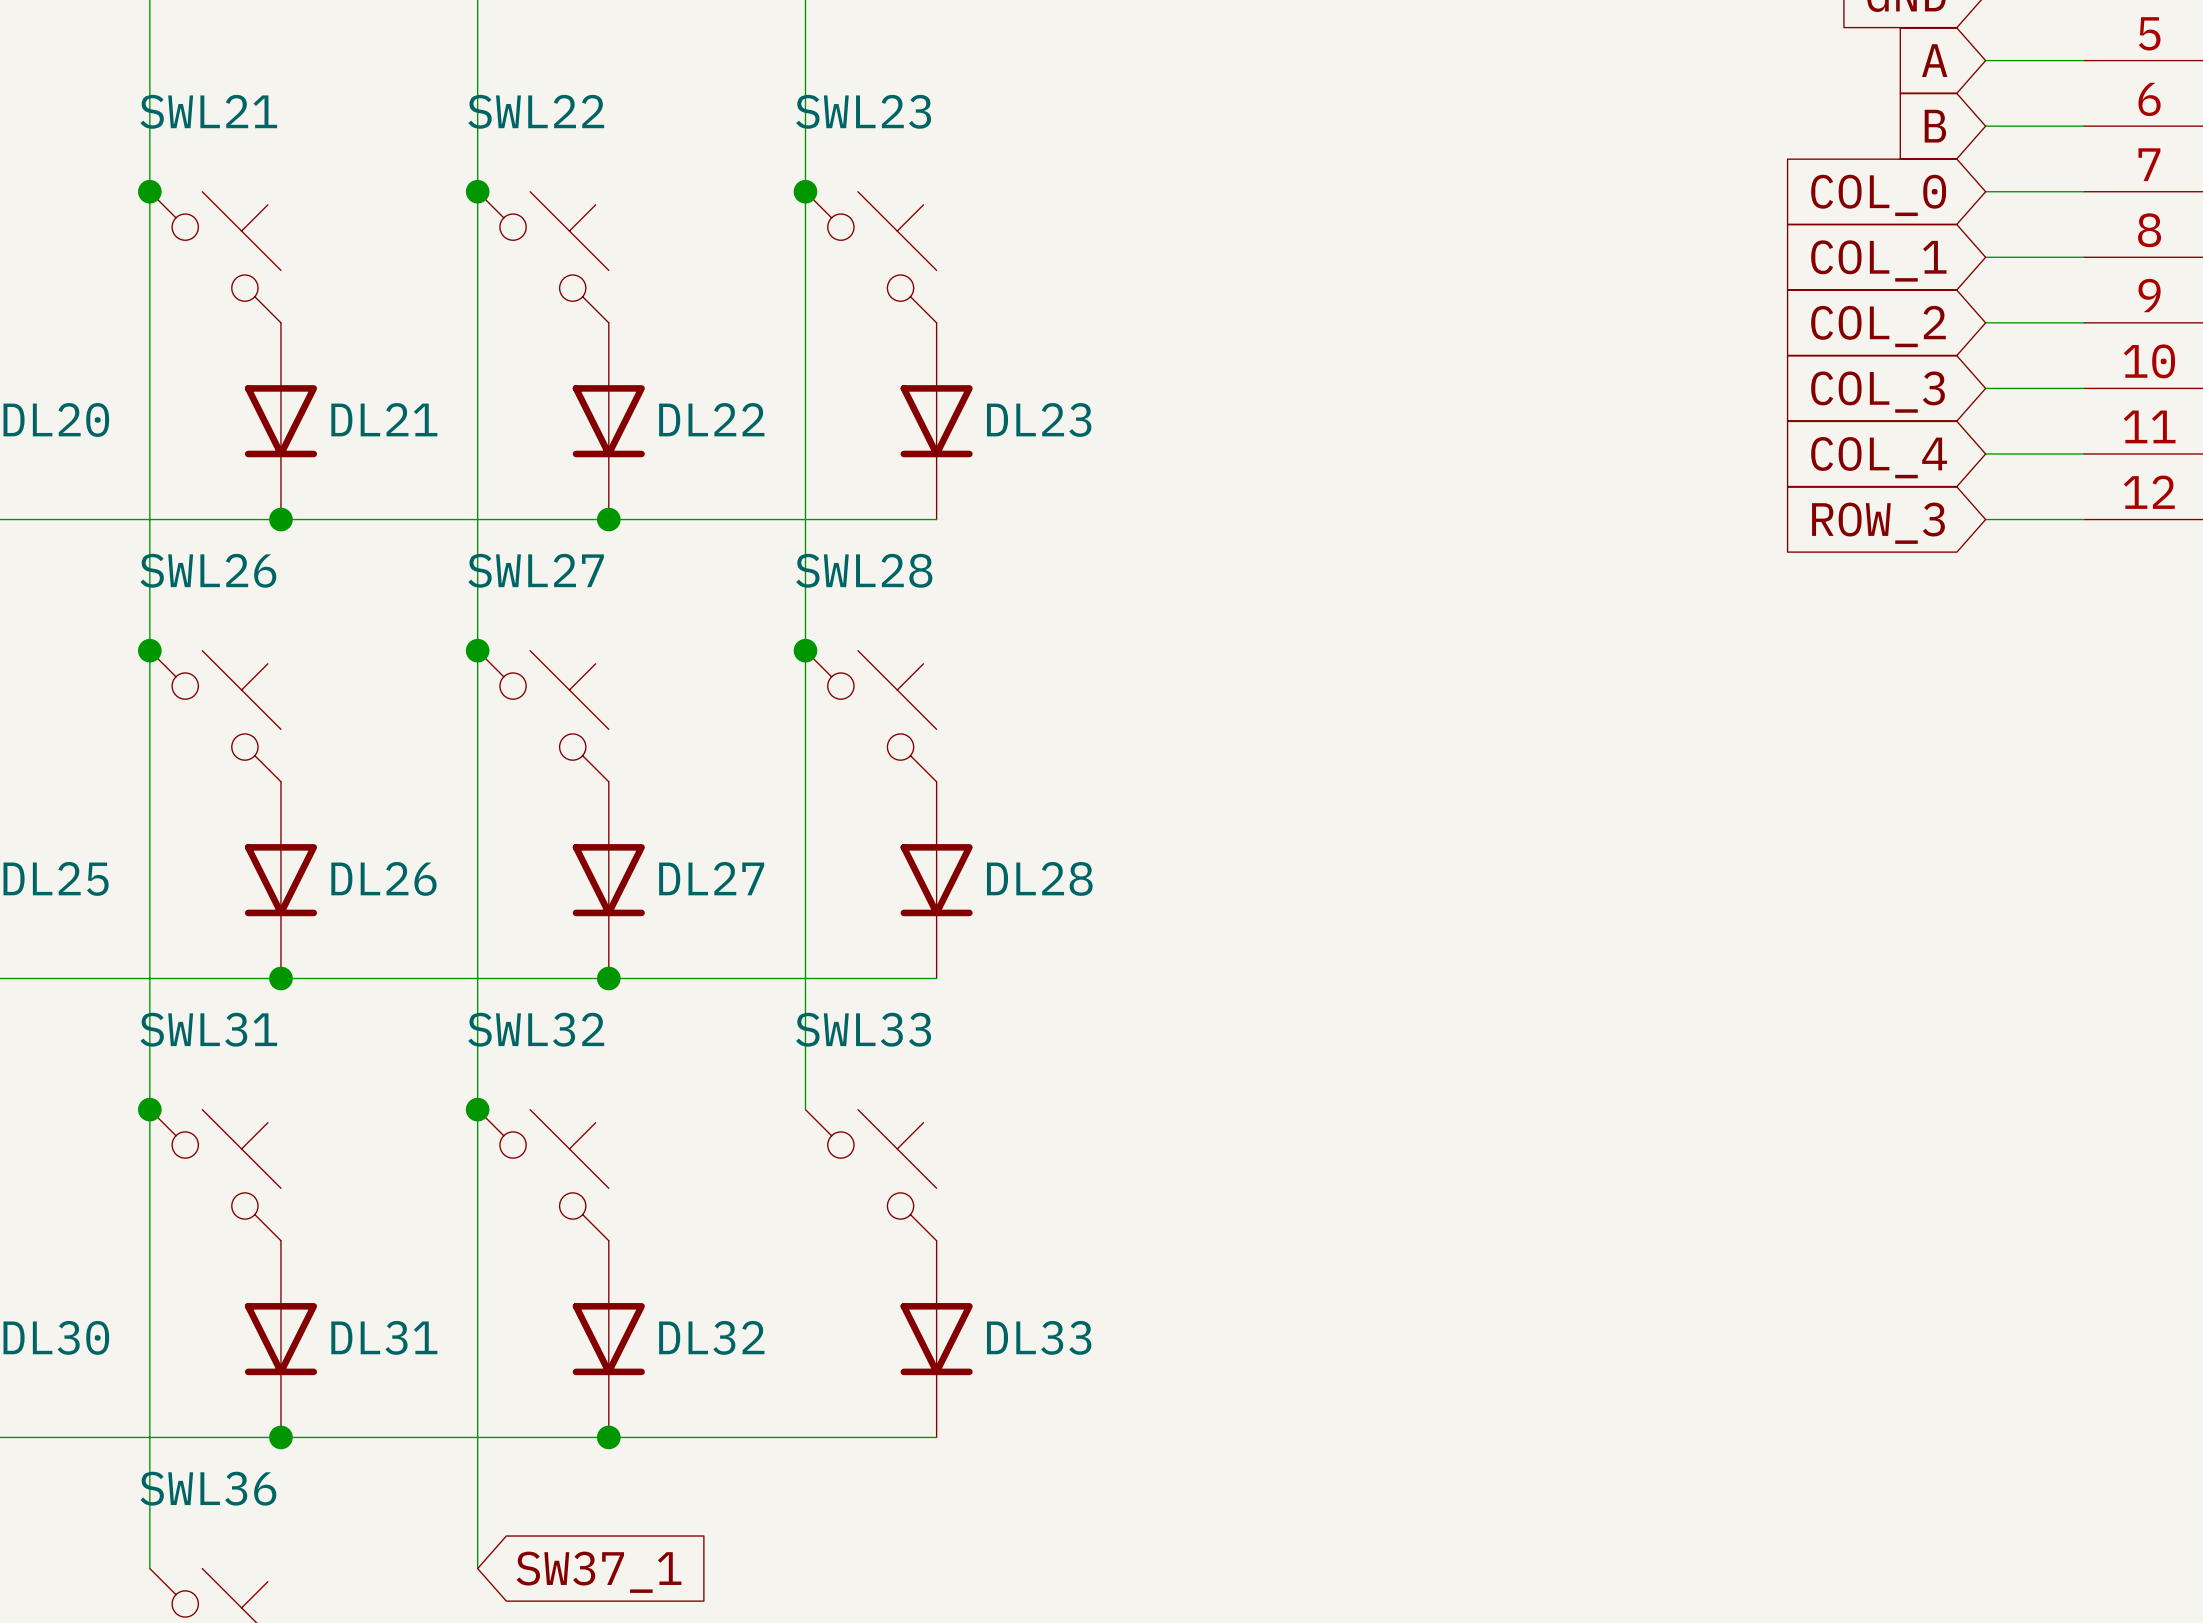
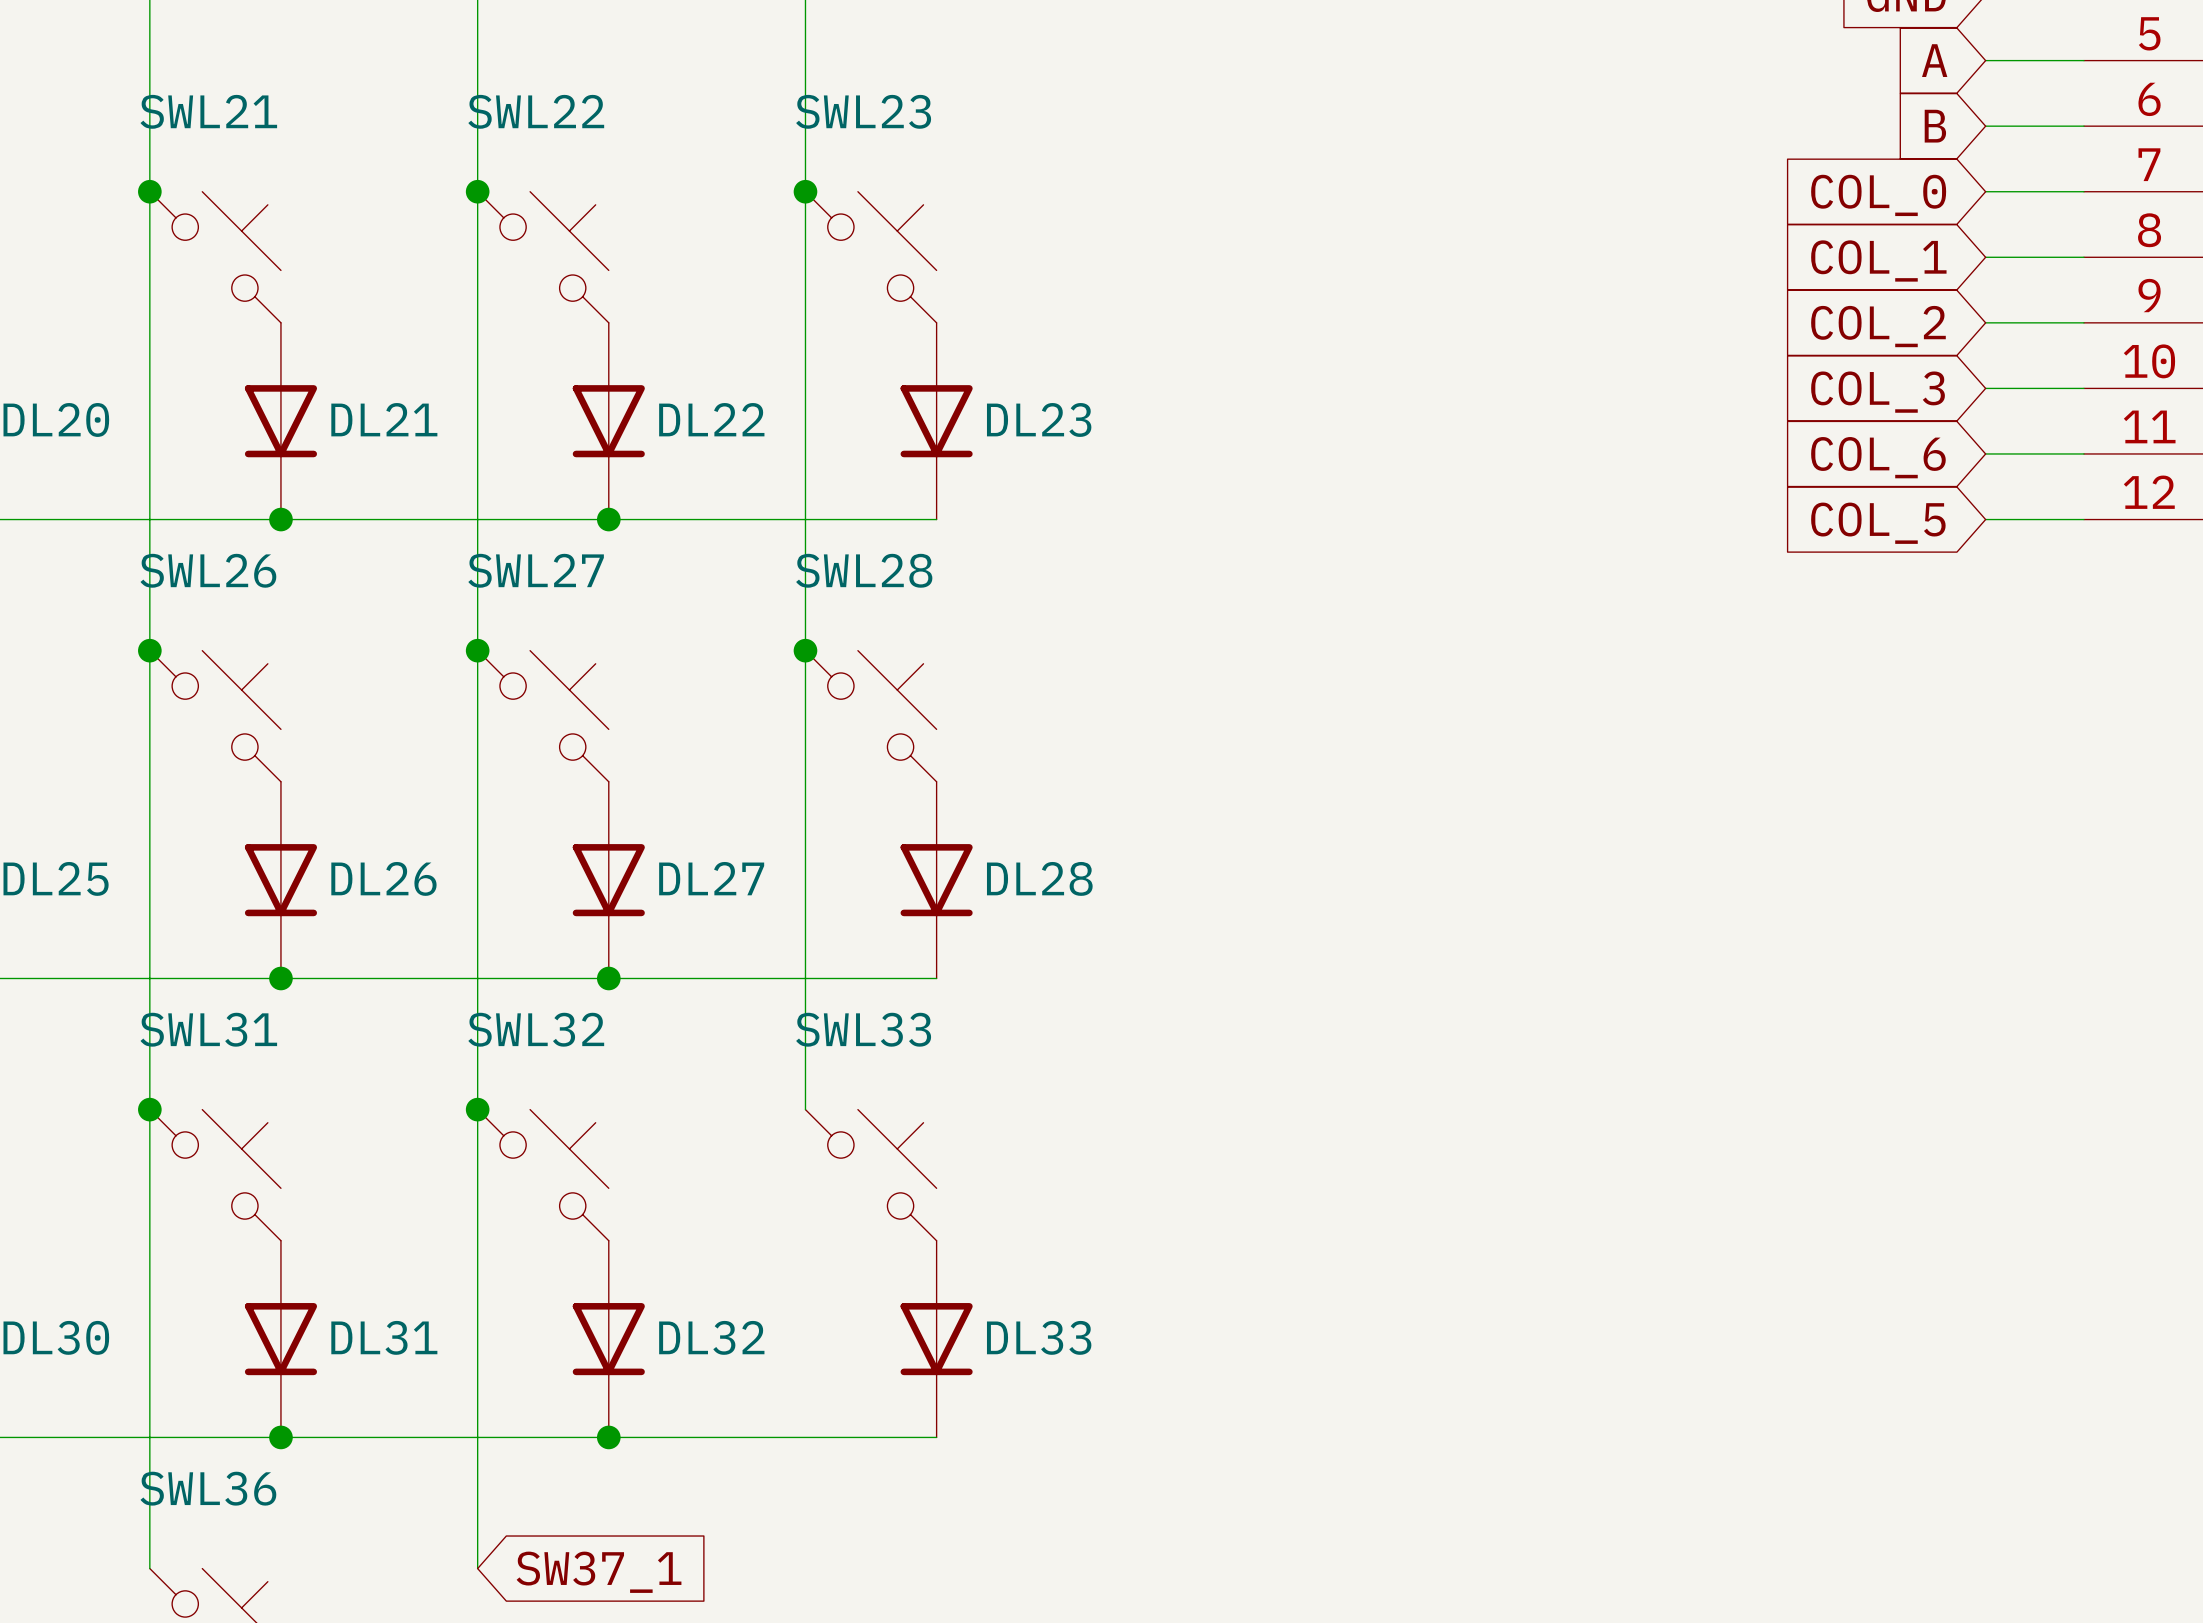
global label: COL_4 (1879, 457) -> COL_6 (1878, 457)
global label: ROW_3 (1878, 523) -> COL_5 (1878, 523)

